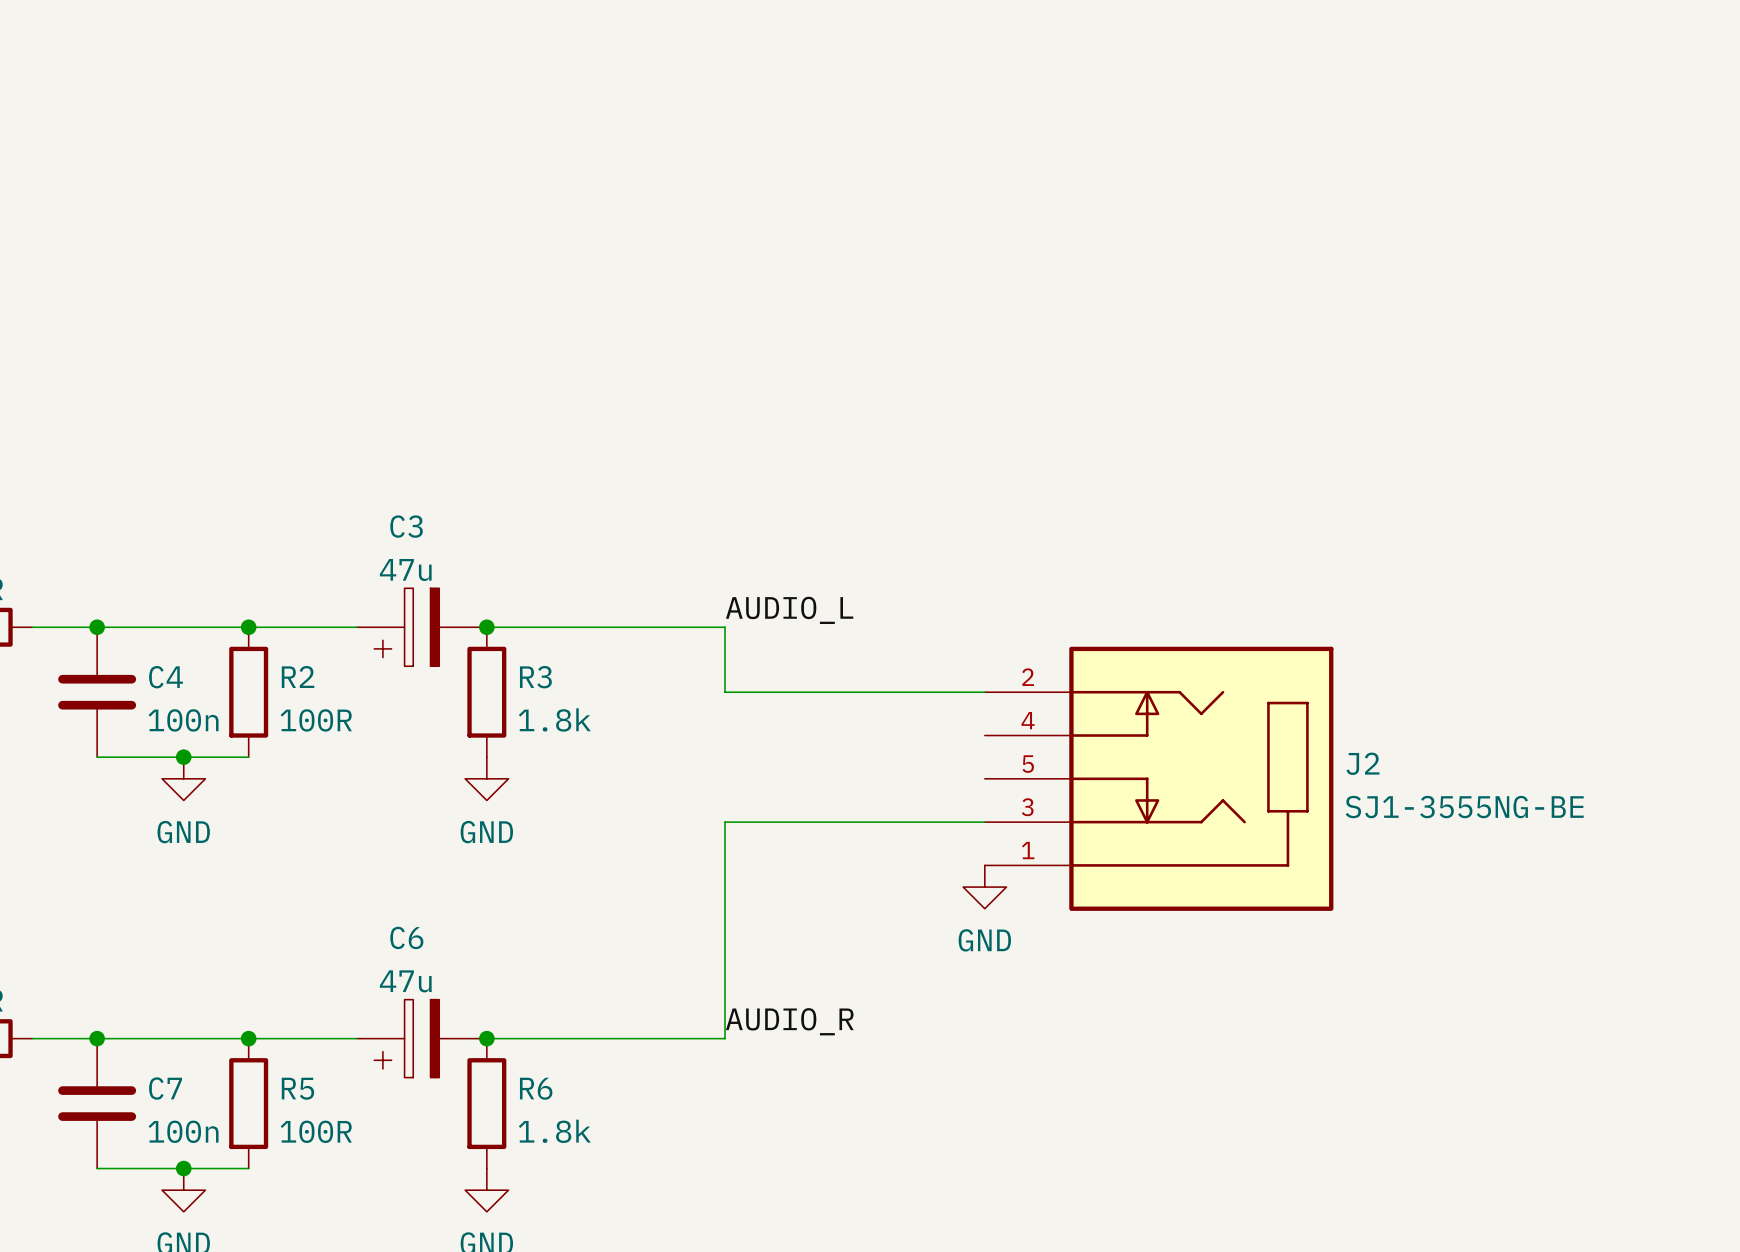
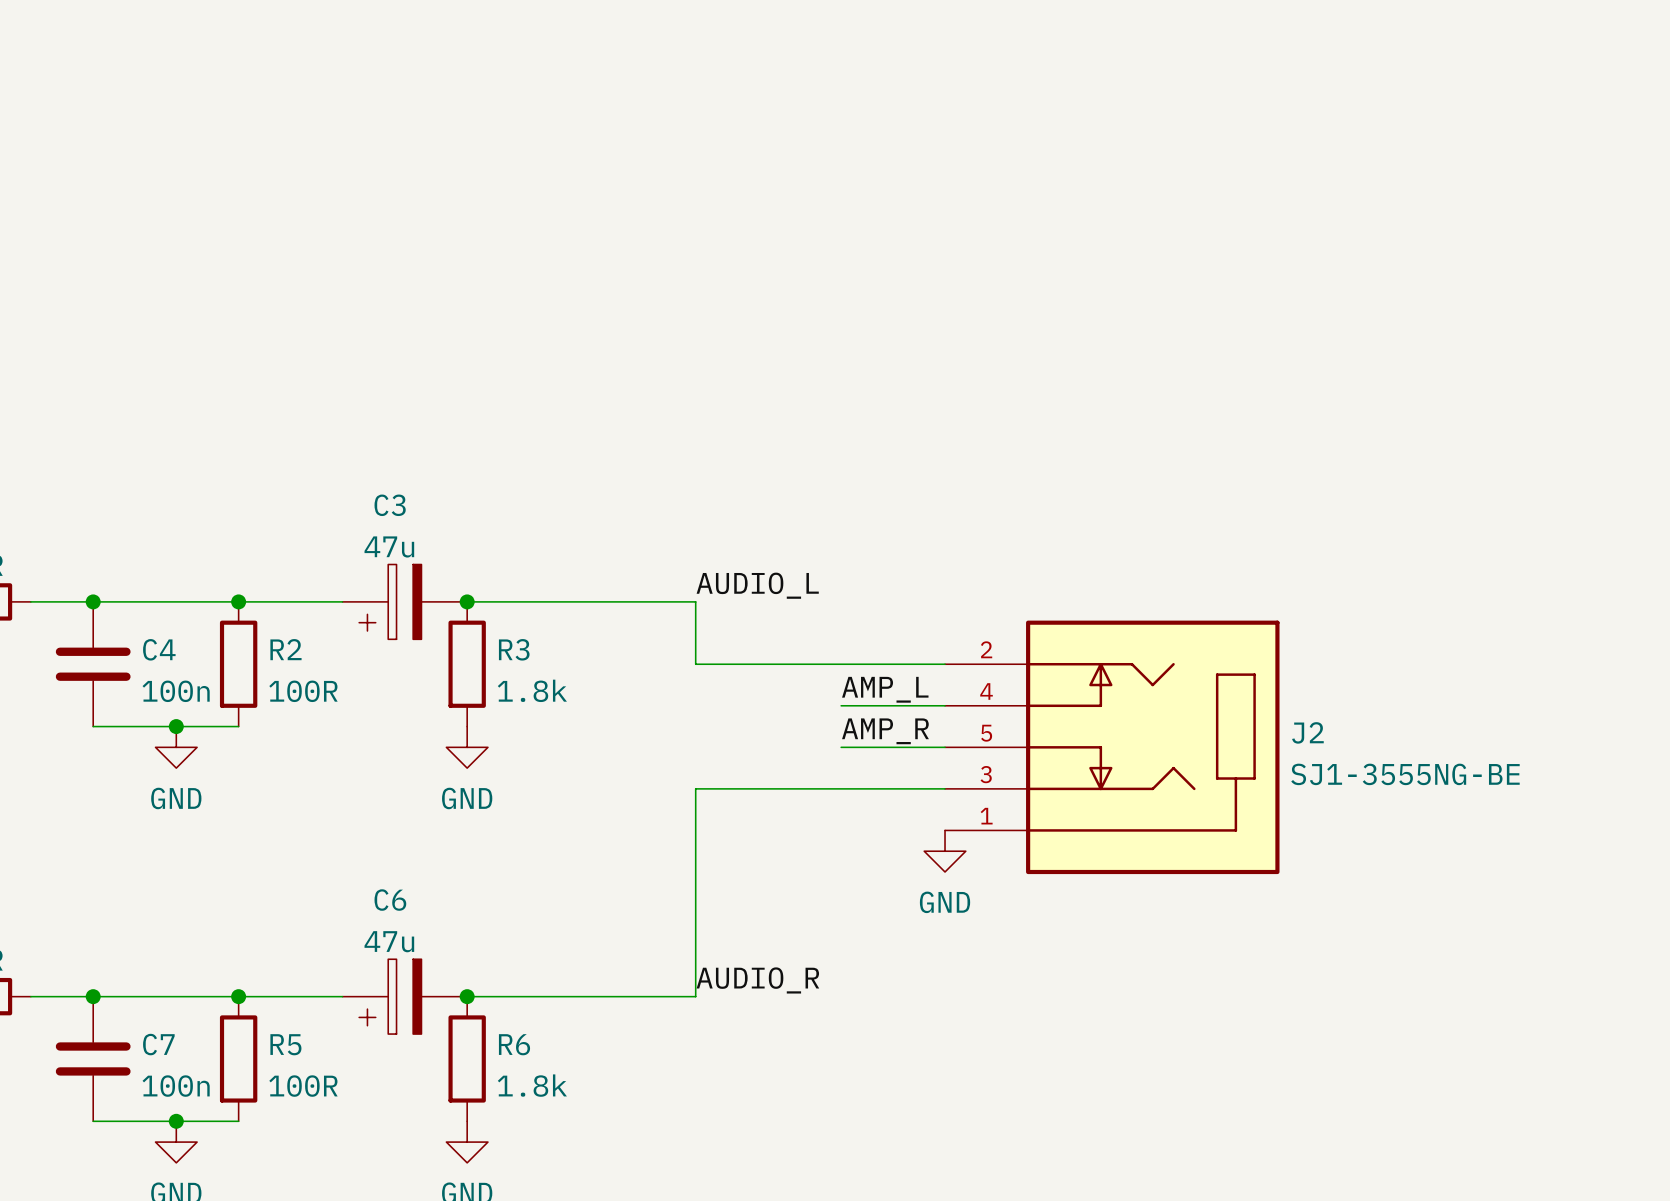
label: none -> AMP_L (885, 689)
wire: none -> (841, 705) (945, 705)
label: none -> AMP_R (885, 731)
wire: none -> (841, 747) (945, 747)

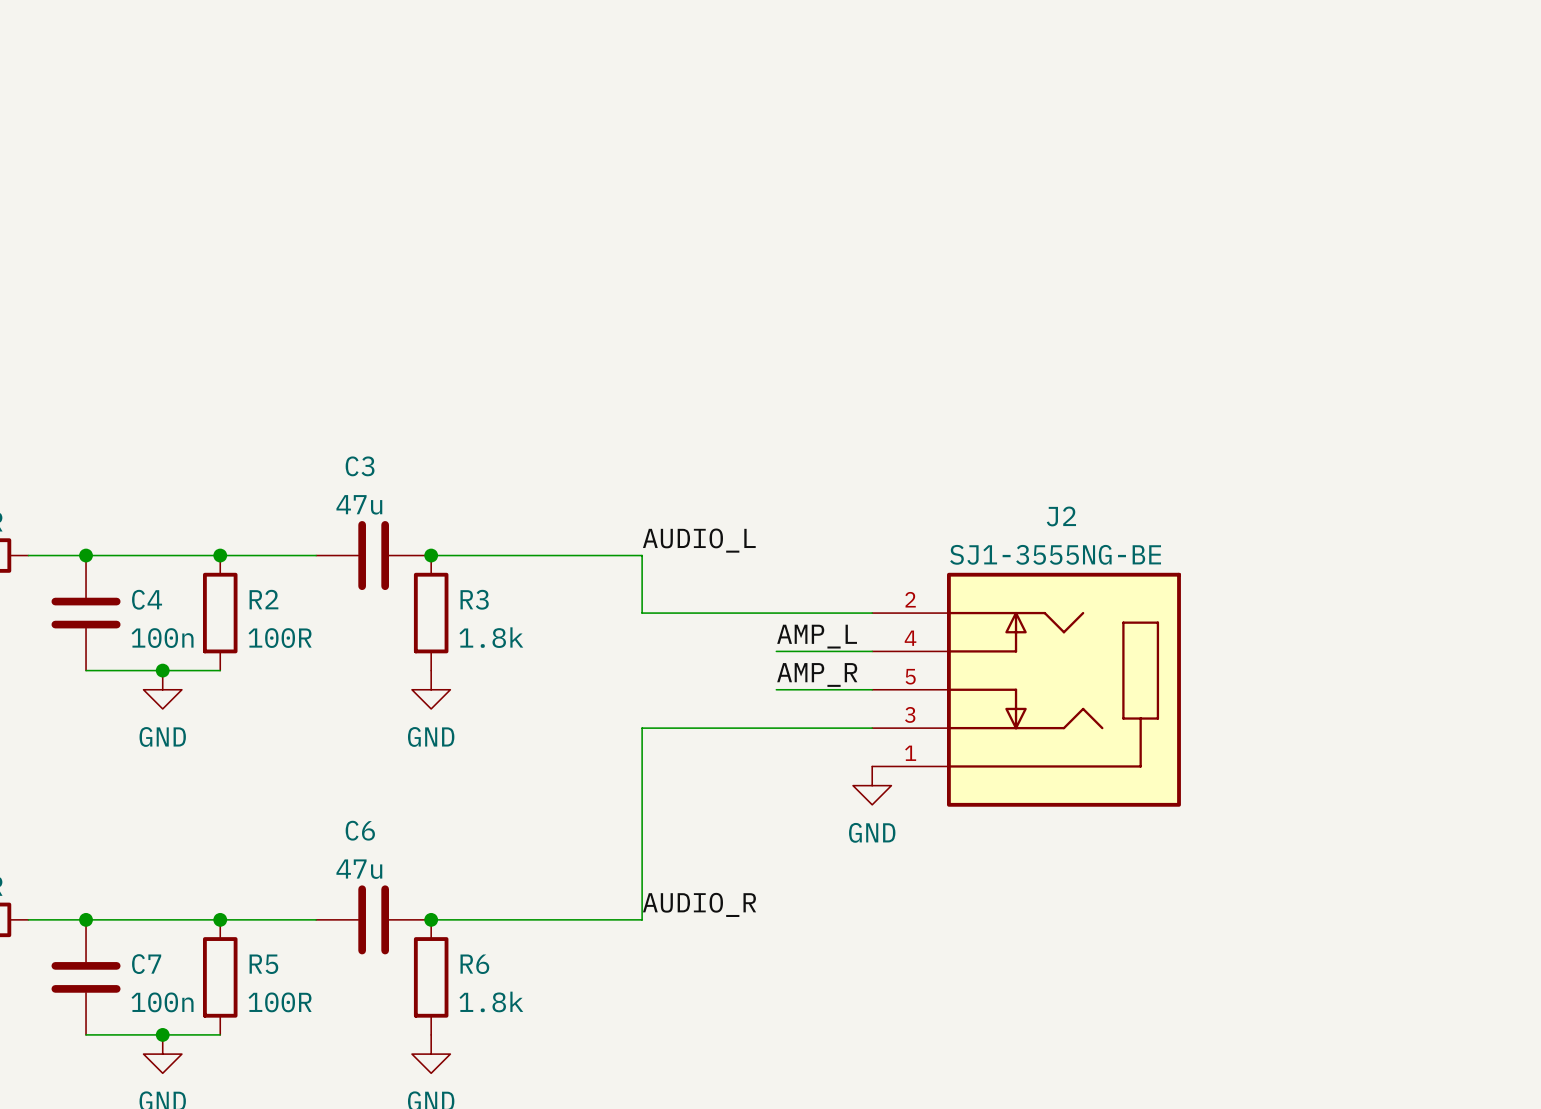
C3 symbol: [342, 564, 468, 640] -> [316, 521, 432, 591]
J2 name position: J2 (1307, 732) -> J2 (1061, 516)
J2 value position: SJ1-3555NG-BE (1405, 774) -> SJ1-3555NG-BE (1055, 554)
C6 symbol: [342, 959, 468, 1035] -> [316, 885, 432, 955]

